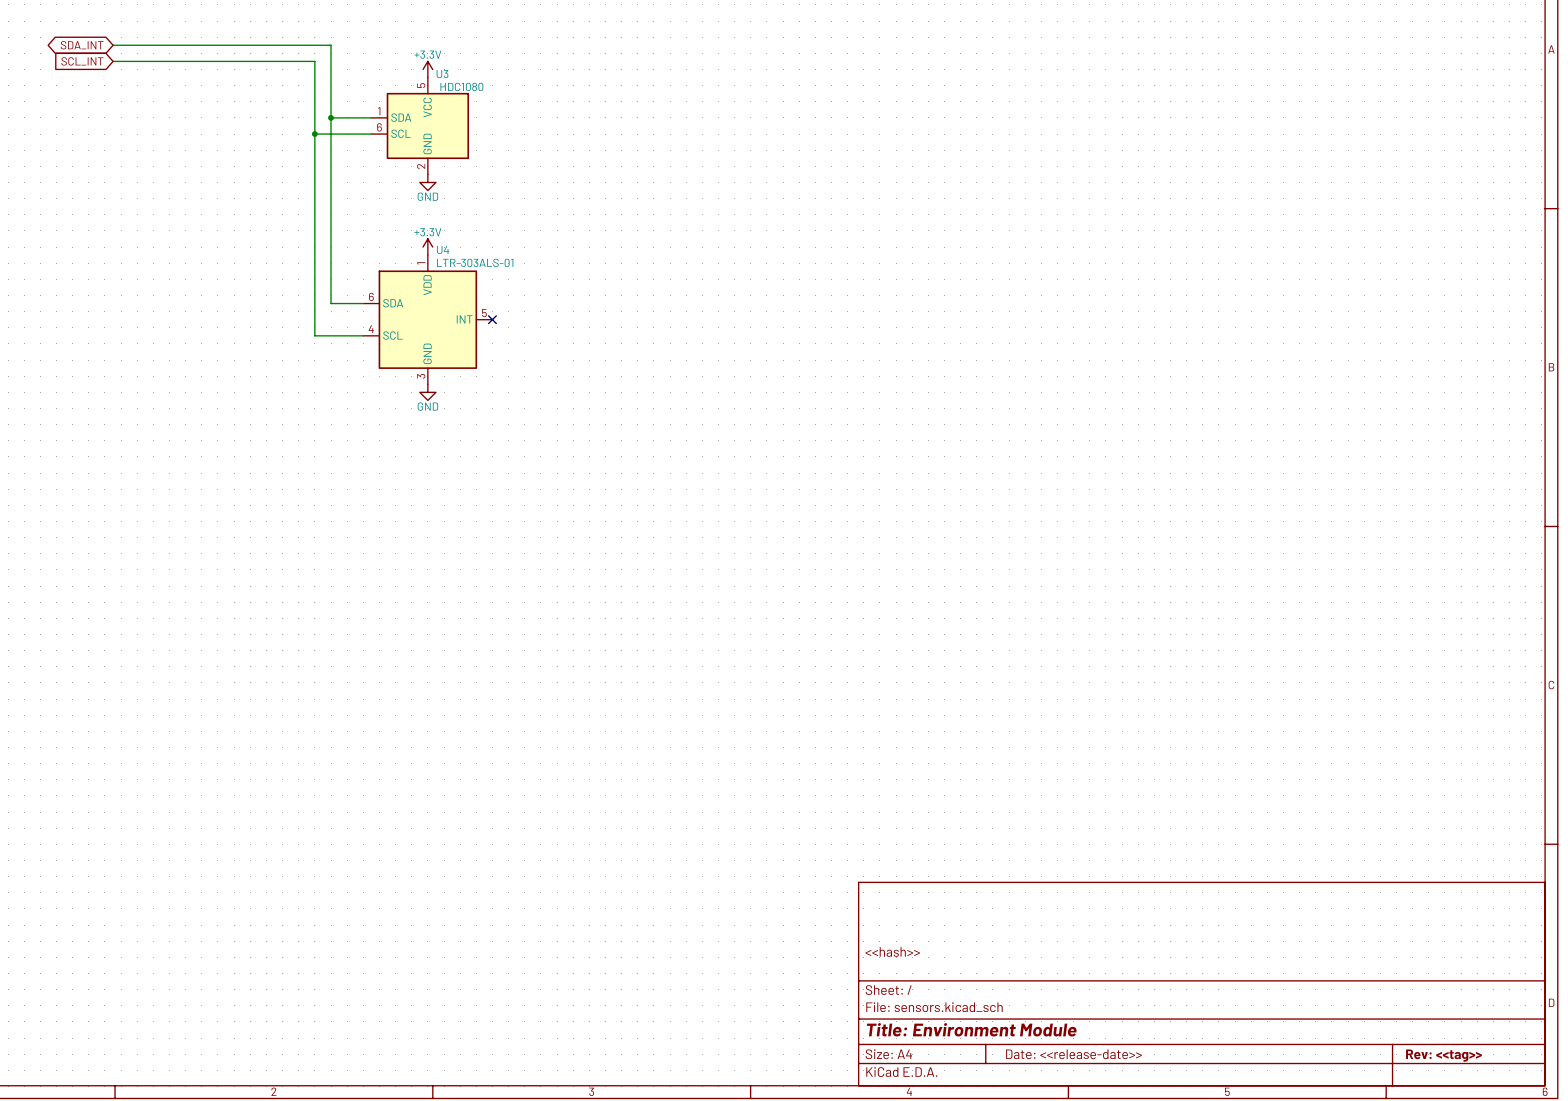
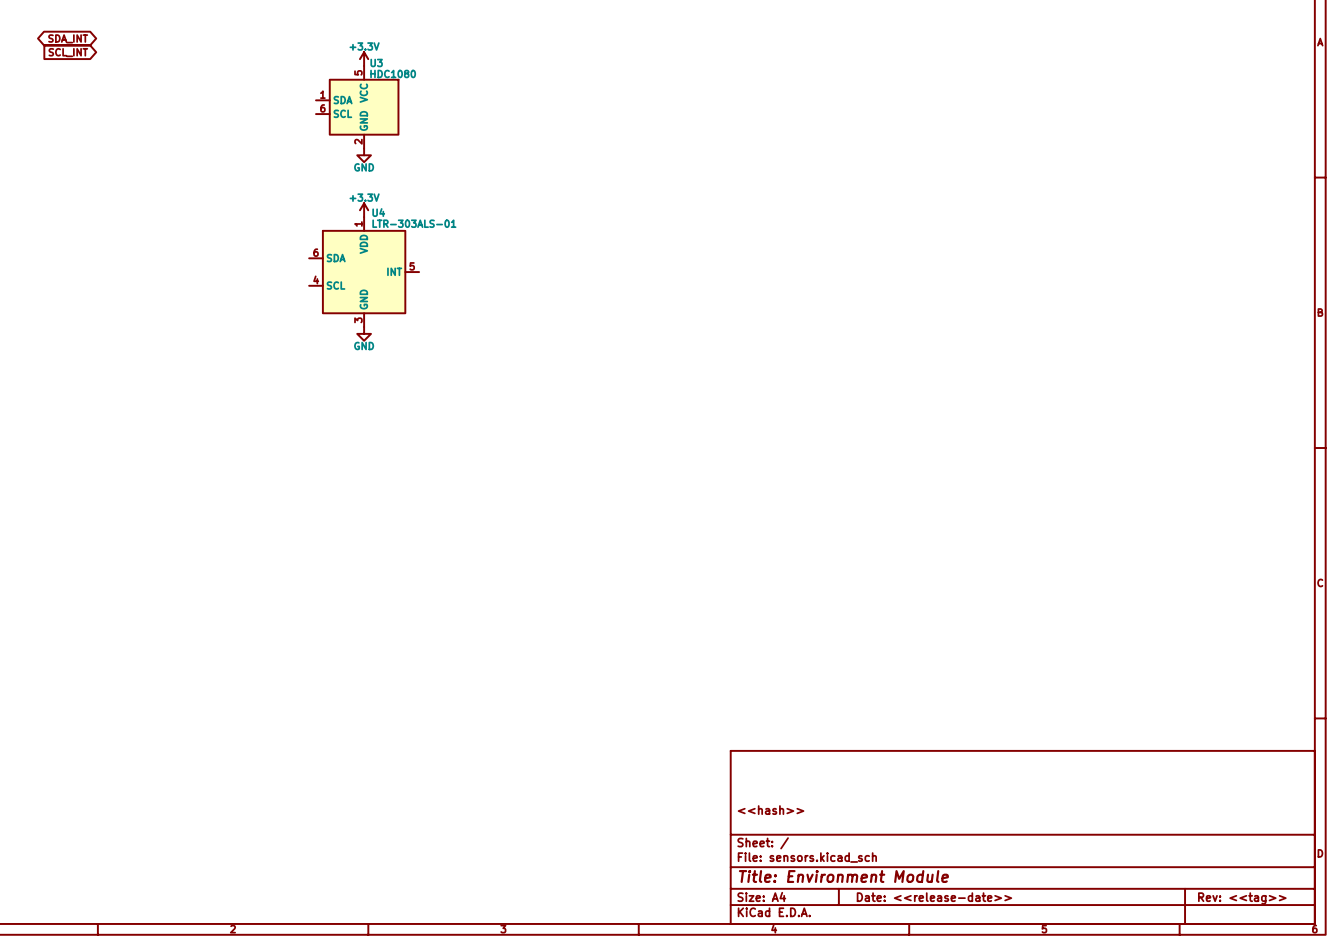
wire: (113, 45) (331, 45) (331, 303) (363, 303) -> none
wire: (113, 61) (314, 61) (314, 335) (363, 335) -> none
wire: (331, 117) (371, 117) -> none
junction: (331, 117) -> none
wire: (314, 134) (371, 134) -> none
junction: (314, 134) -> none
no-connect mark: (492, 319) -> none

